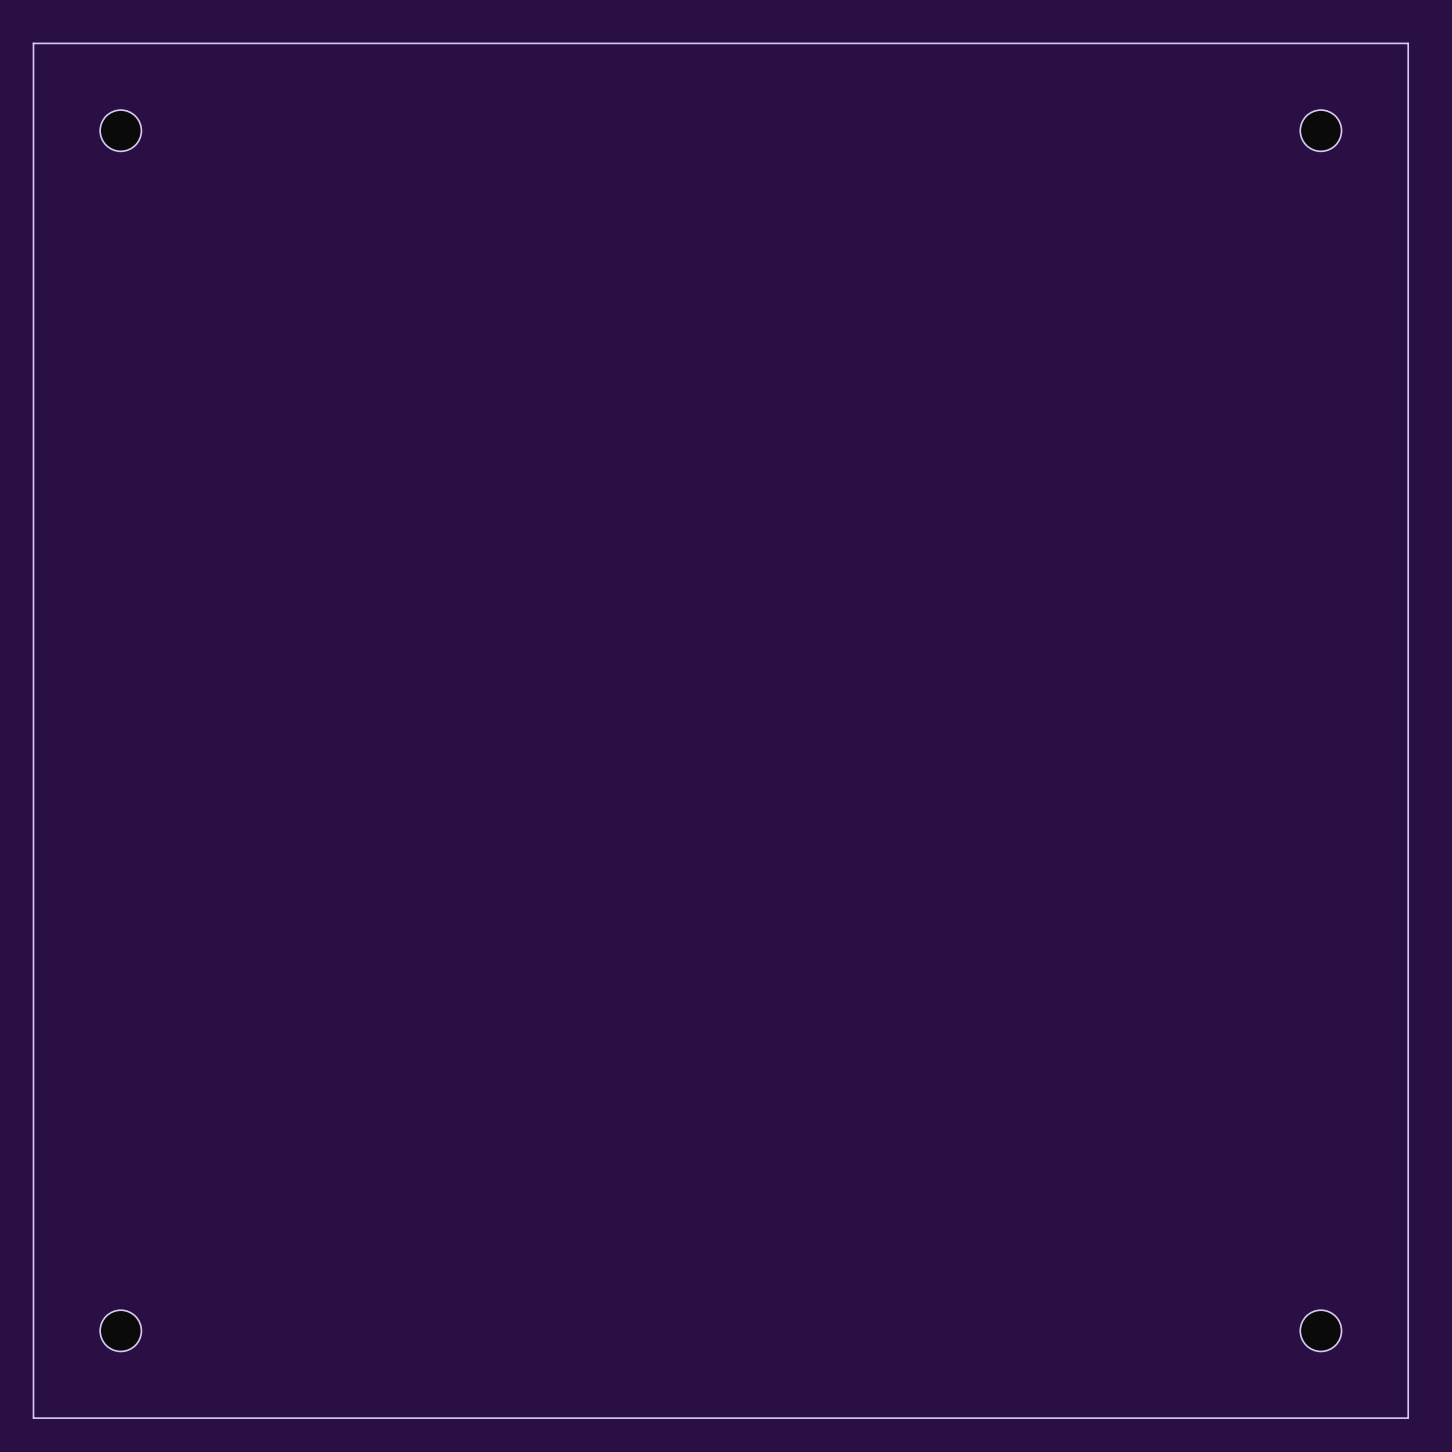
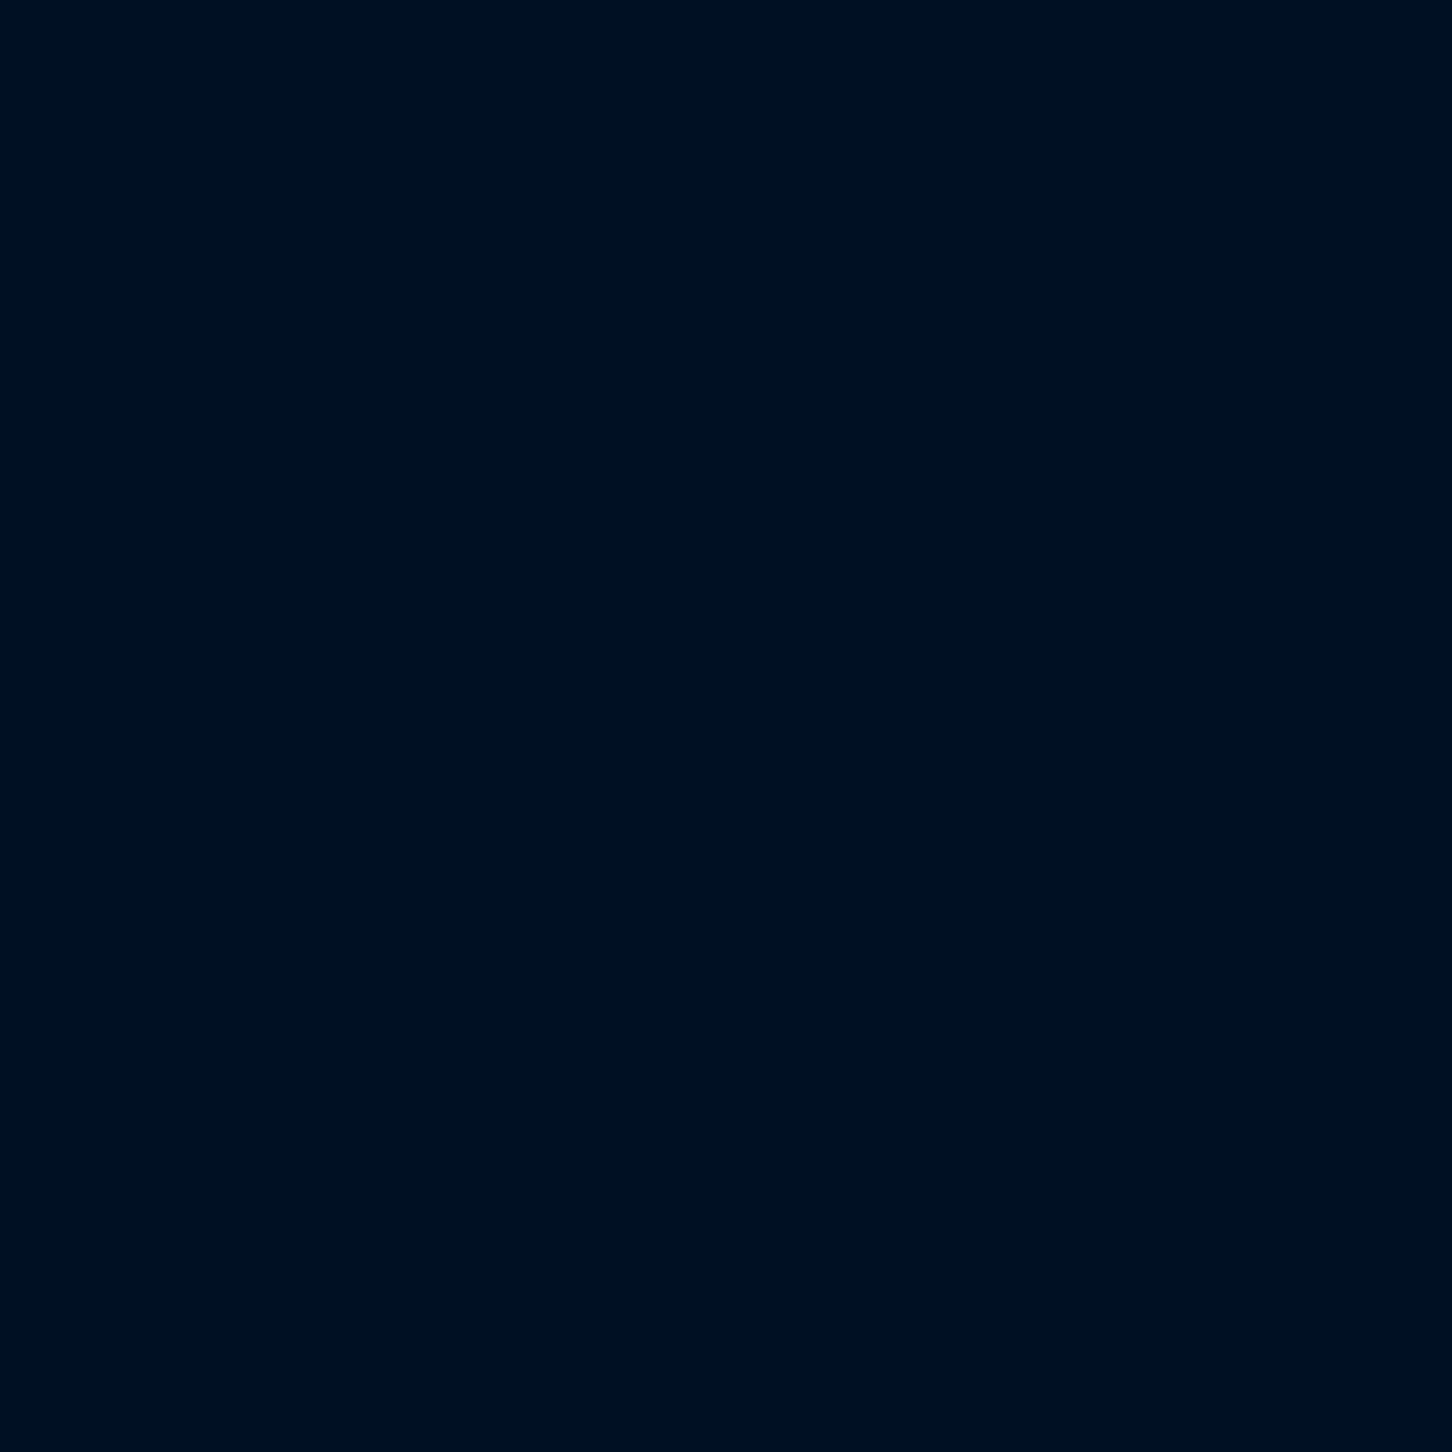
board edge: (1408, 43) (33, 43) (33, 1418) (1408, 1418) (1408, 43) -> none
part: (120, 130) -> none
part: (1320, 130) -> none
part: (120, 1330) -> none
part: (1320, 1330) -> none

